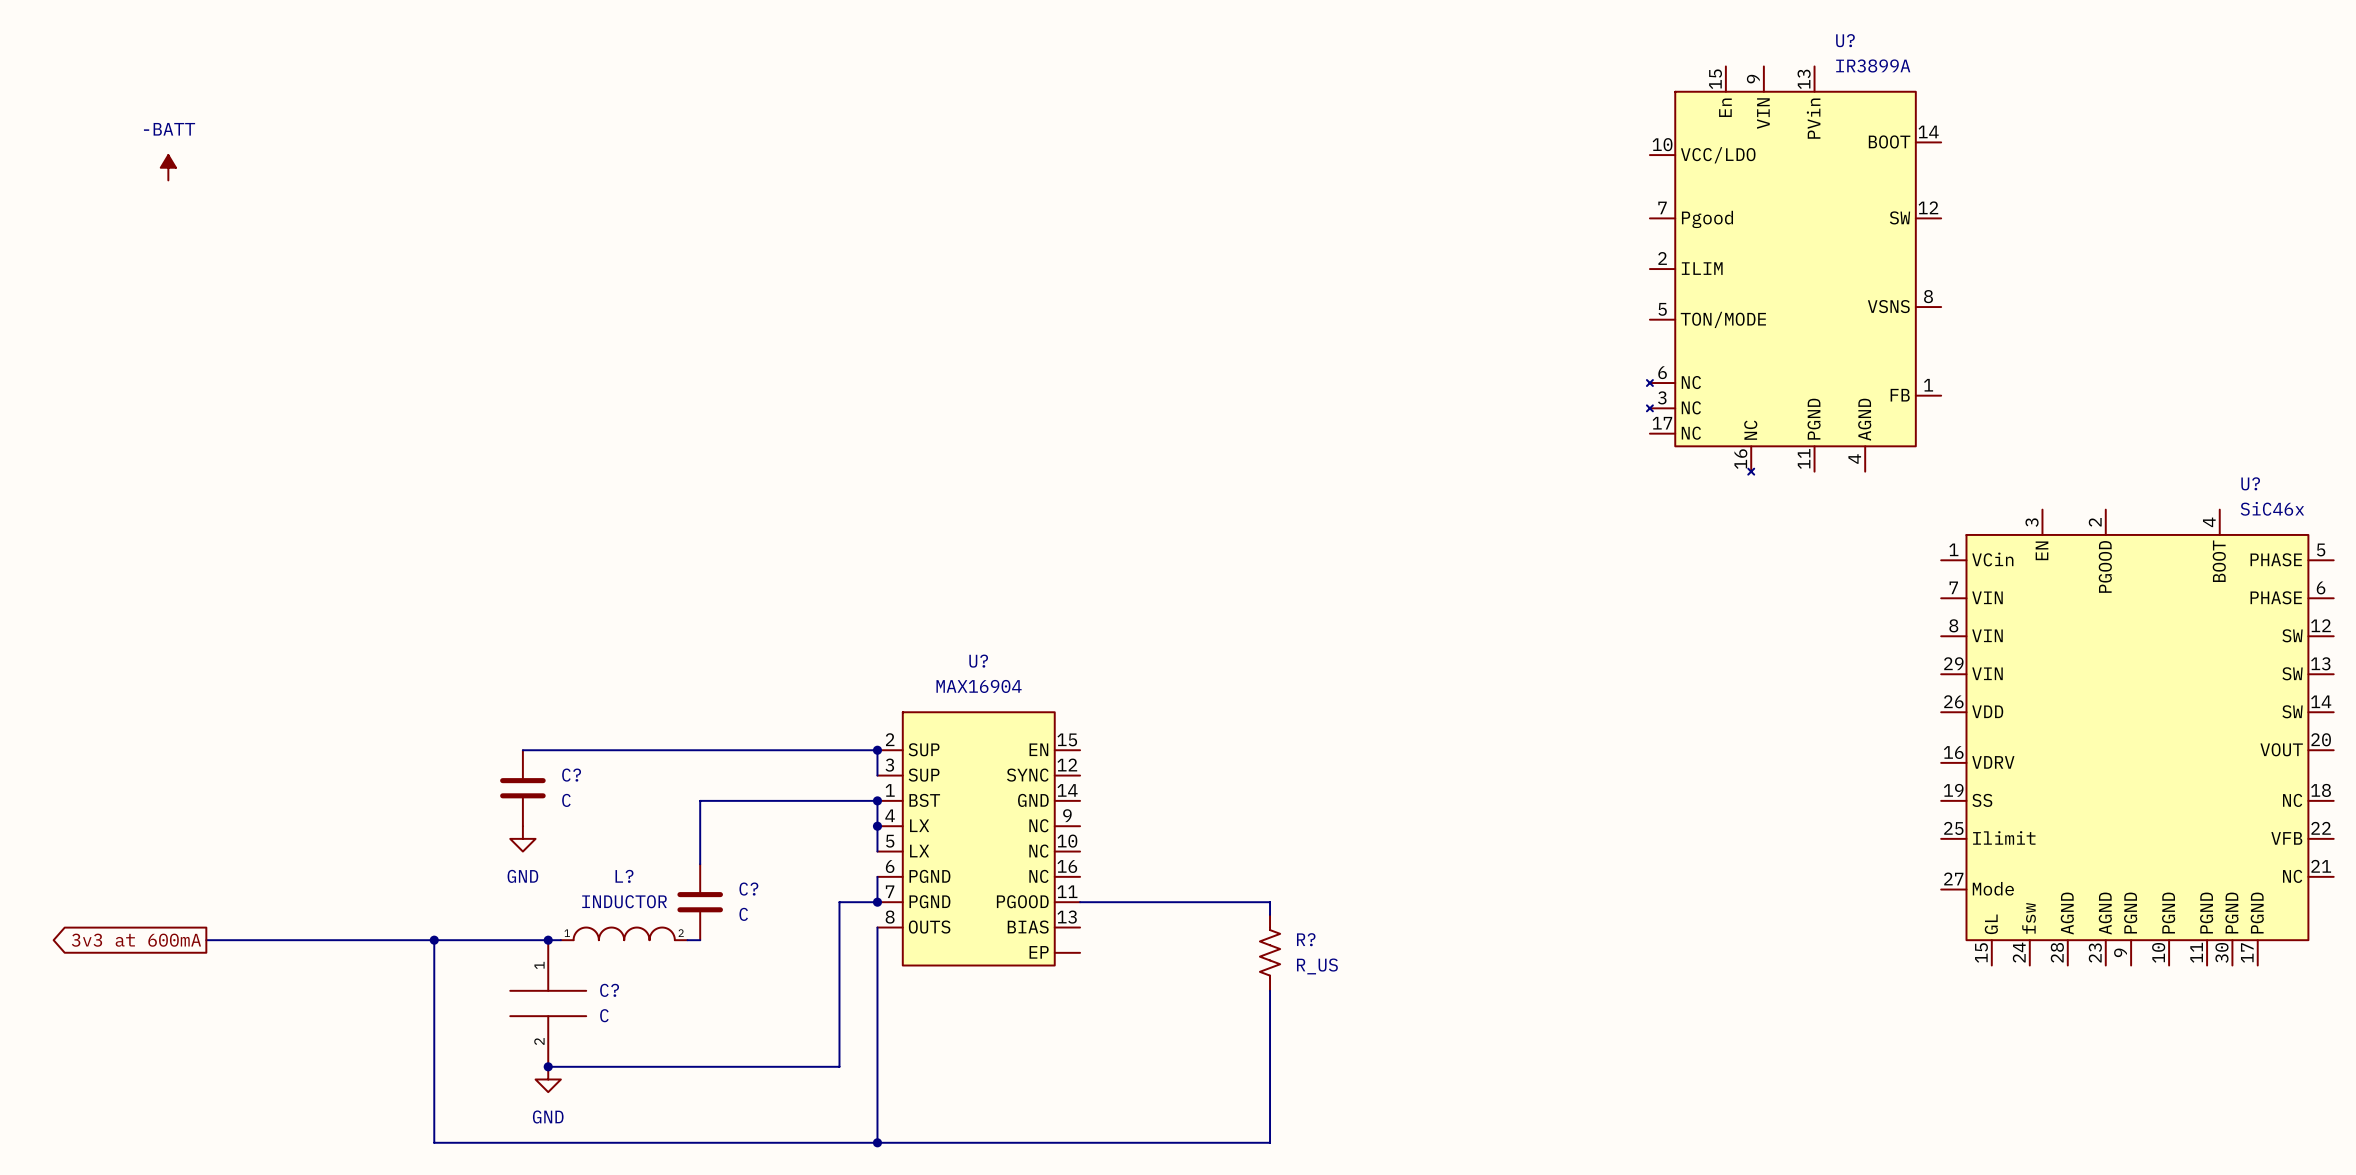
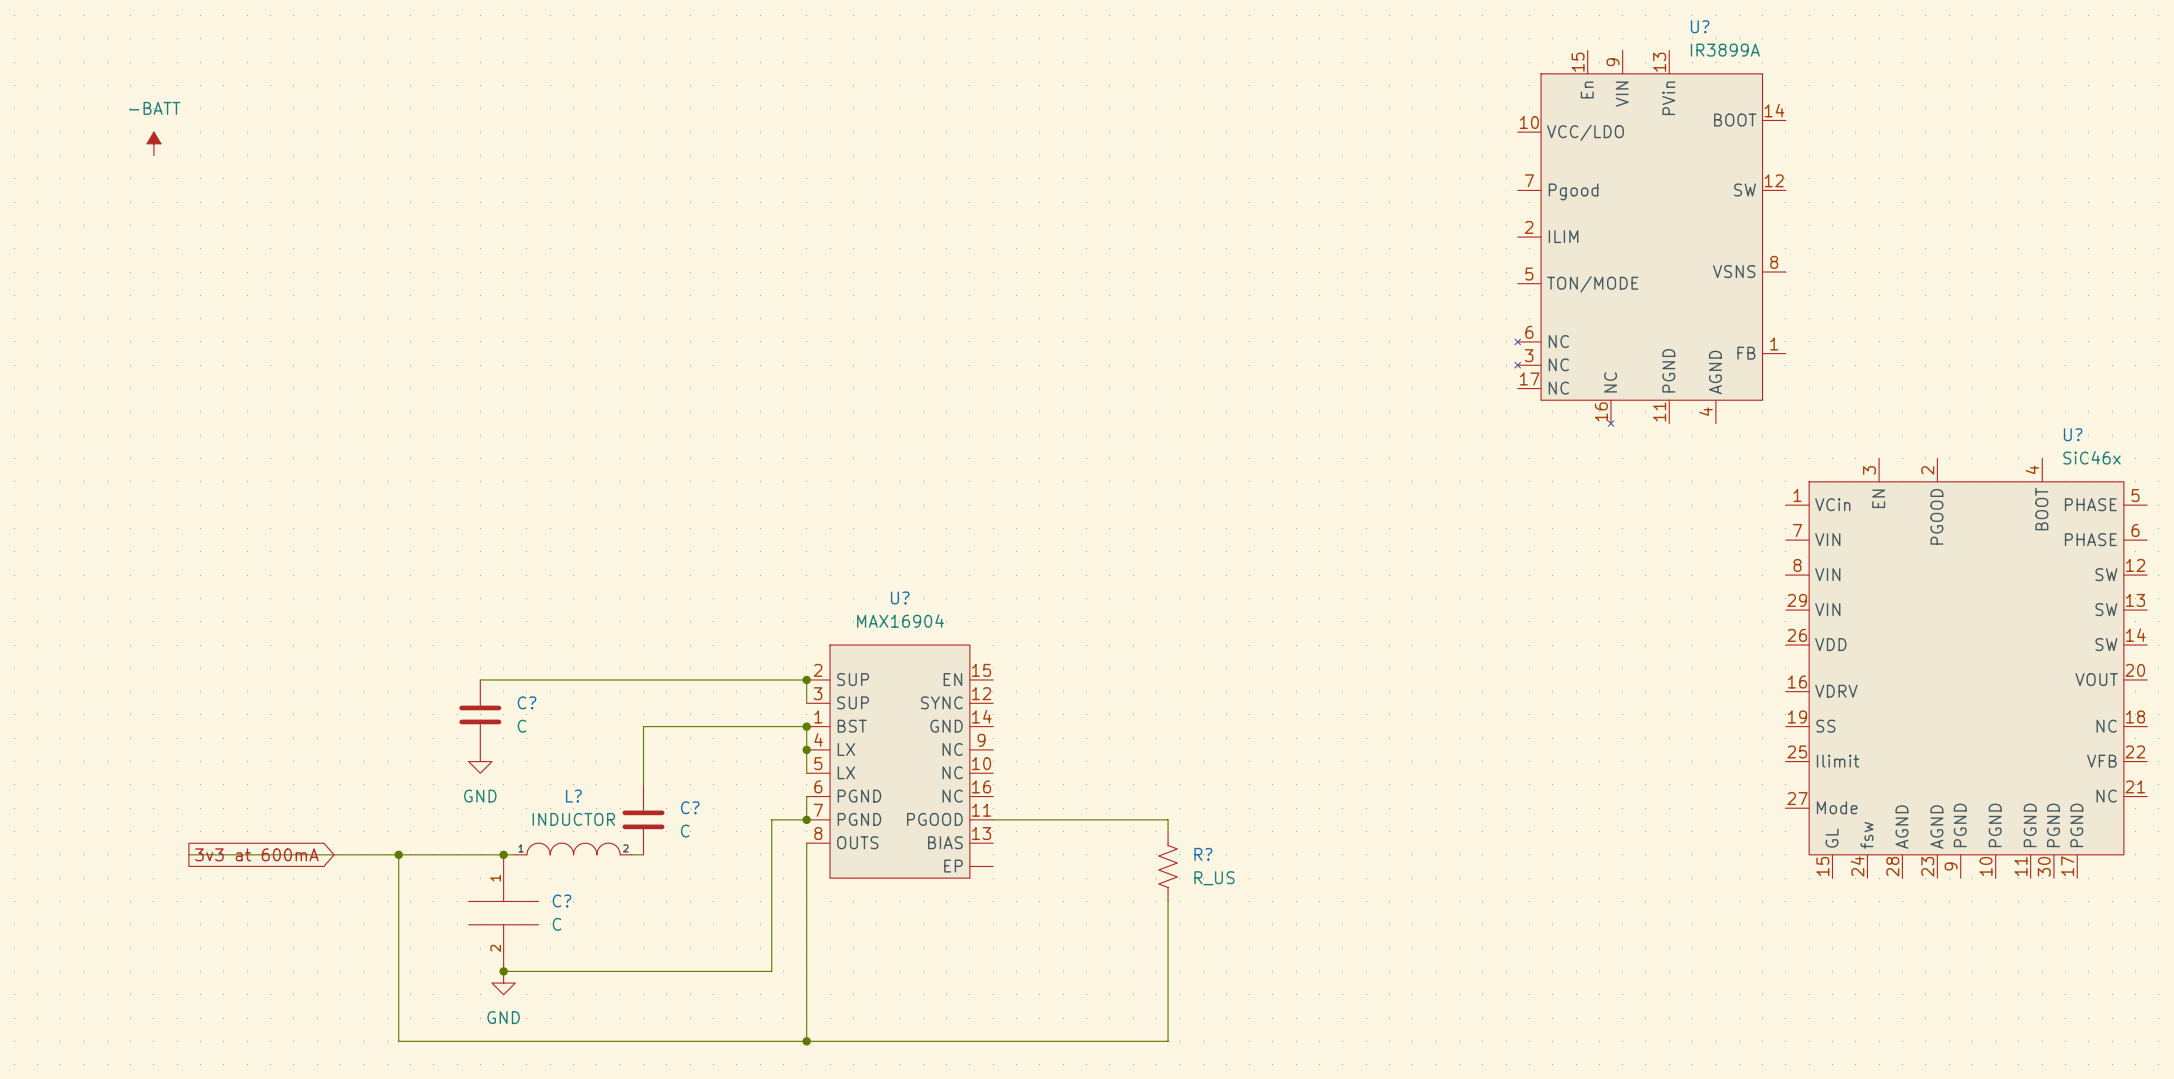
global label rotation: 0° (136, 940) -> 180° (256, 854)

